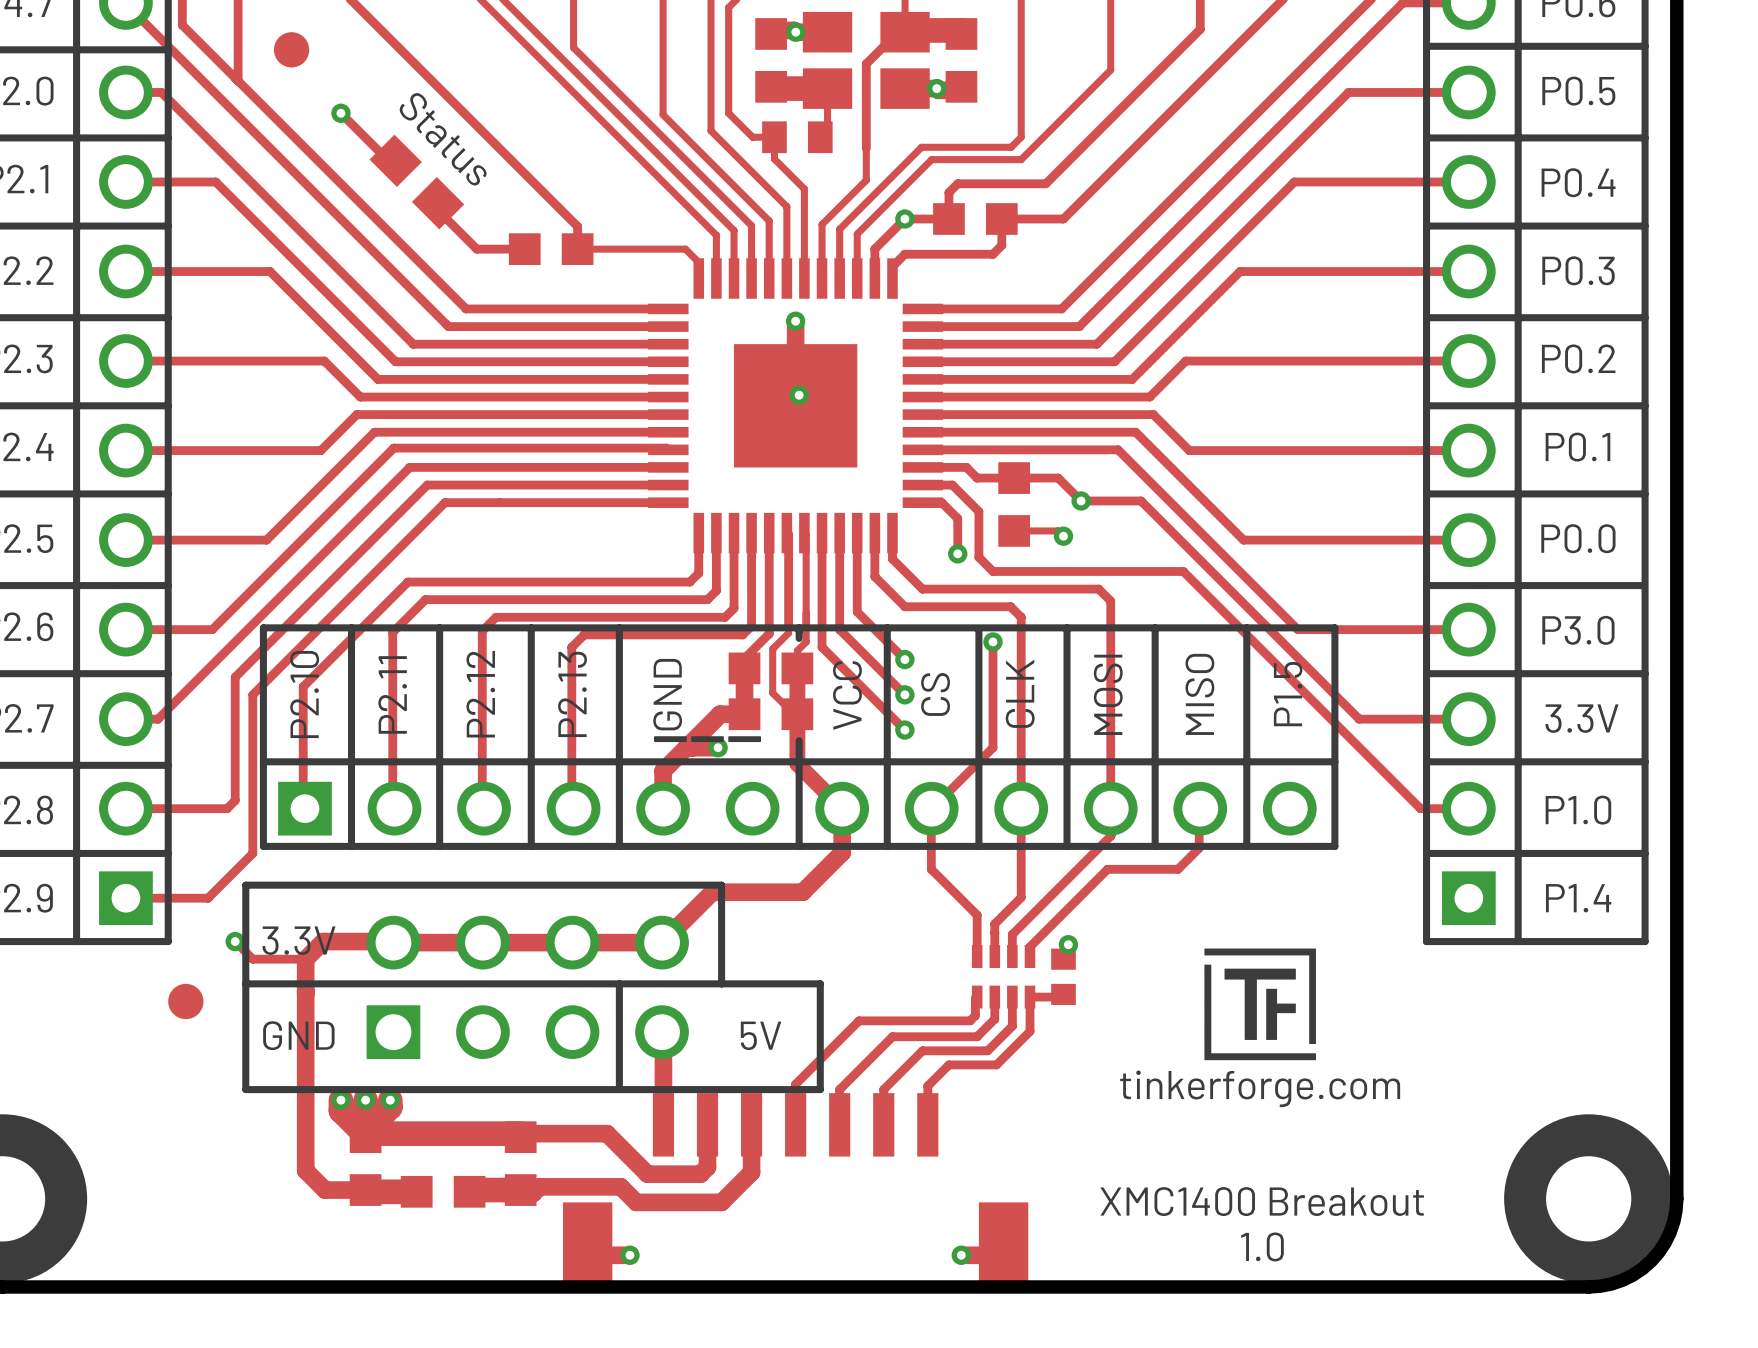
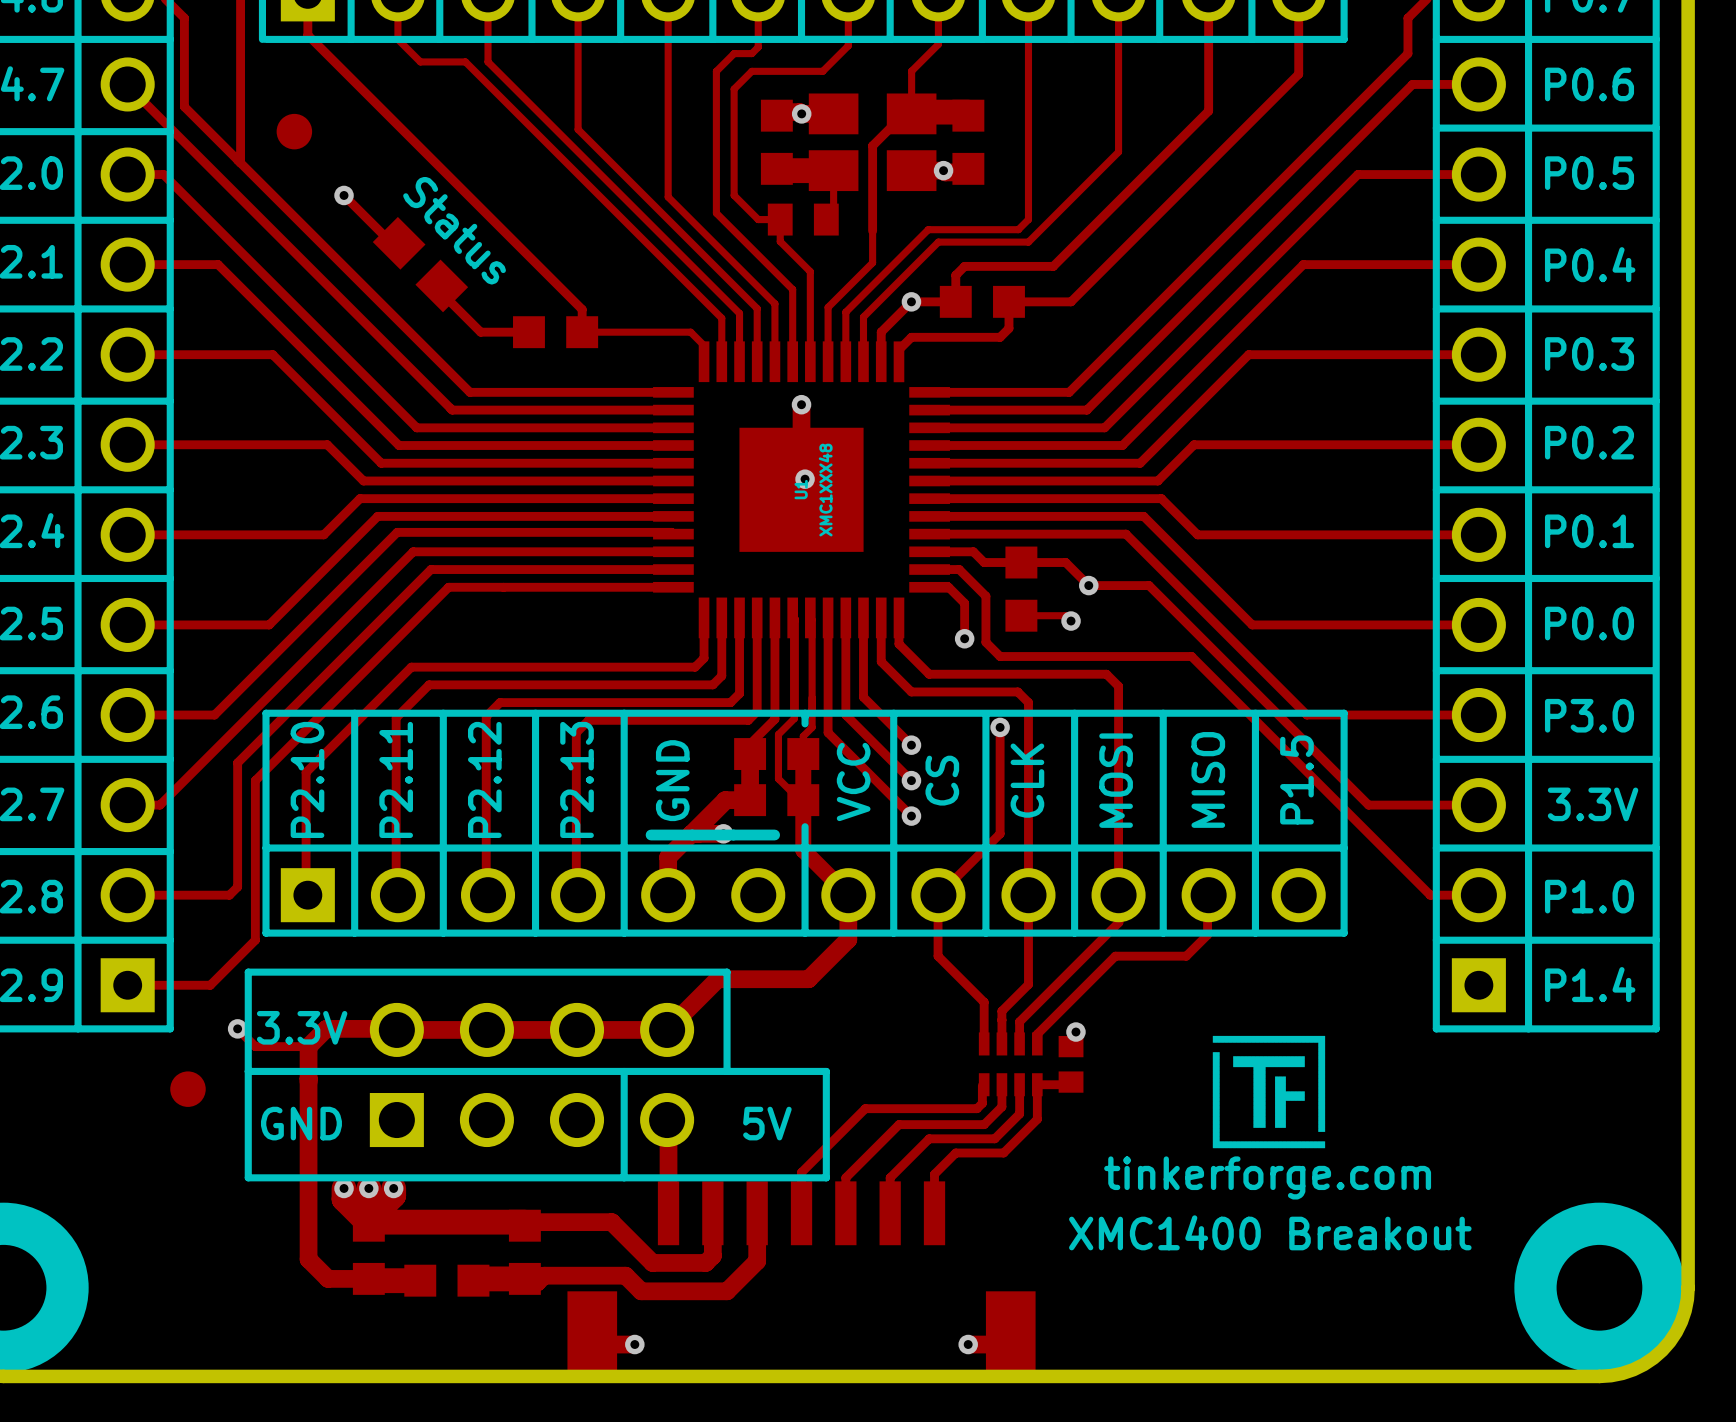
U1 name: none -> U1 (801, 489)
U1 value: none -> XMC1XXX48 (825, 490)
text position: XMC1400 Breakout (1262, 1201) -> XMC1400 Breakout (1270, 1232)
text: 1.0 (1262, 1246) -> none

